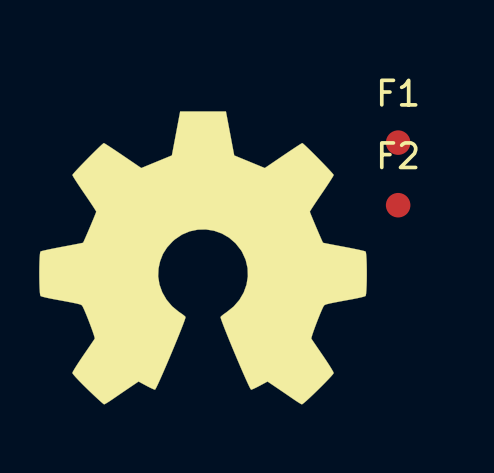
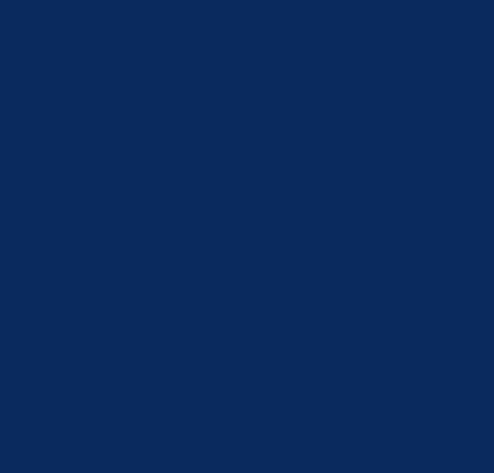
drawing: [39, 111, 367, 405] -> none
F1: (398, 142) -> none
F2: (398, 205) -> none

